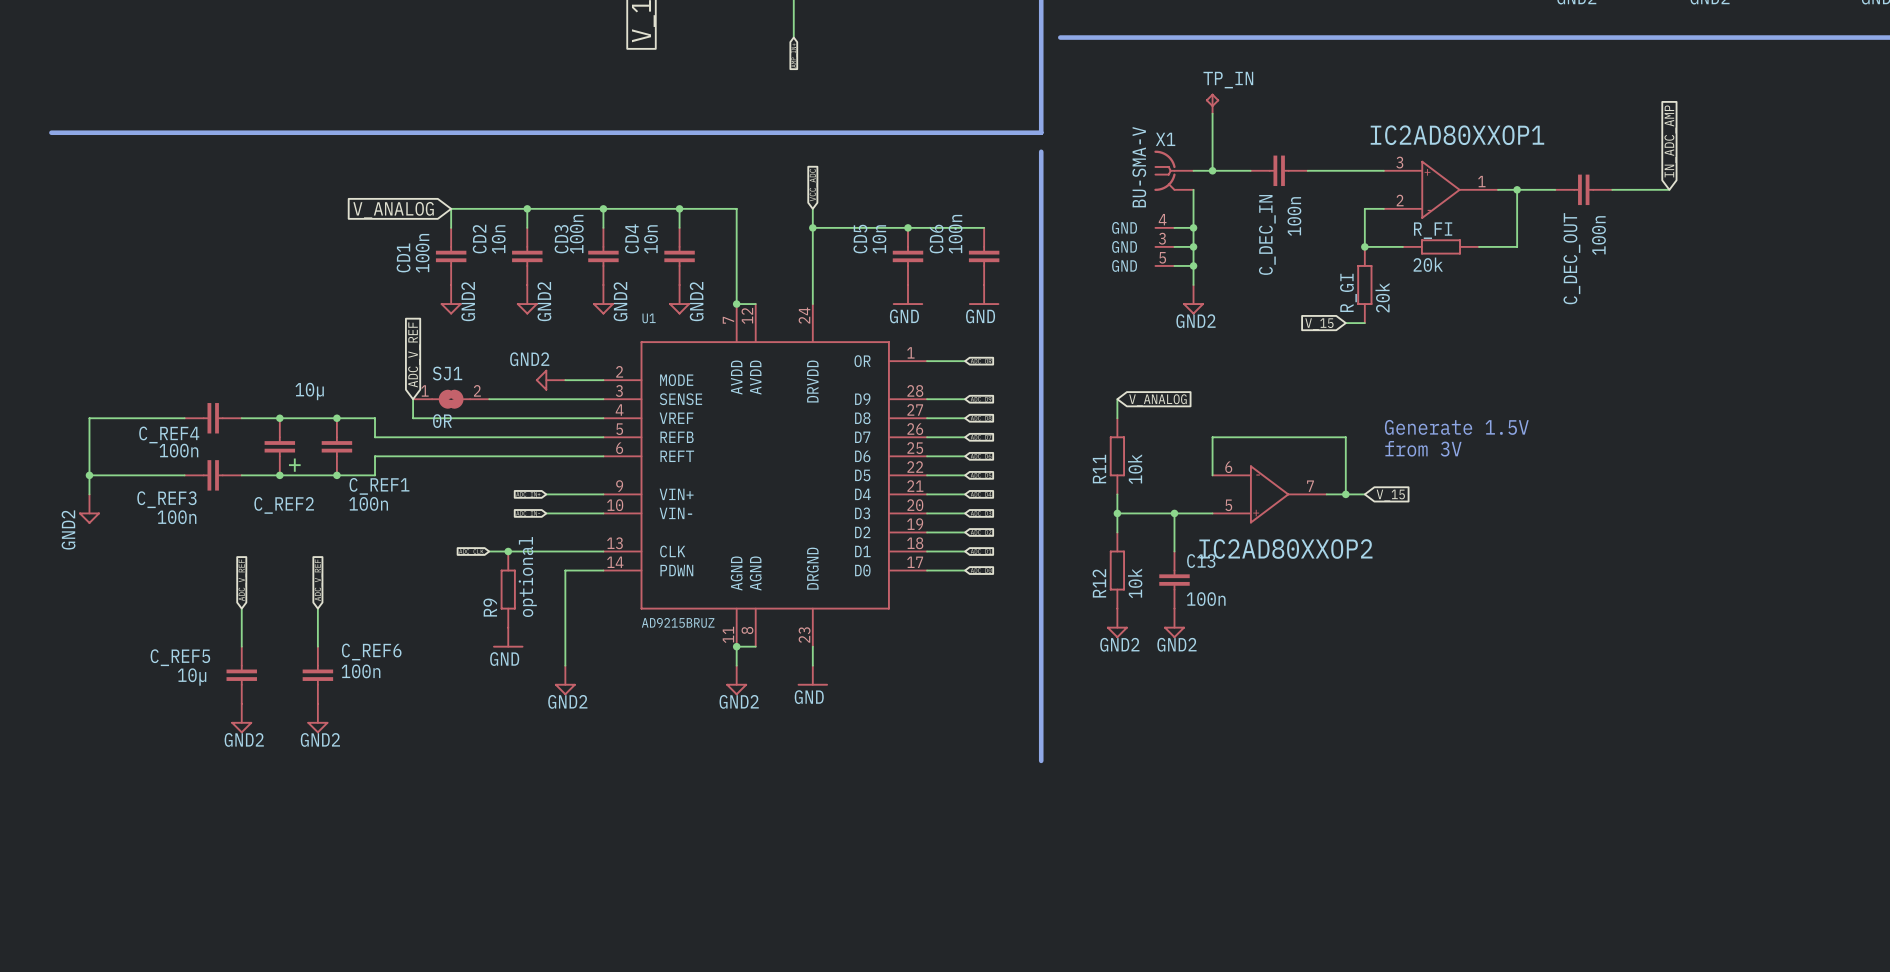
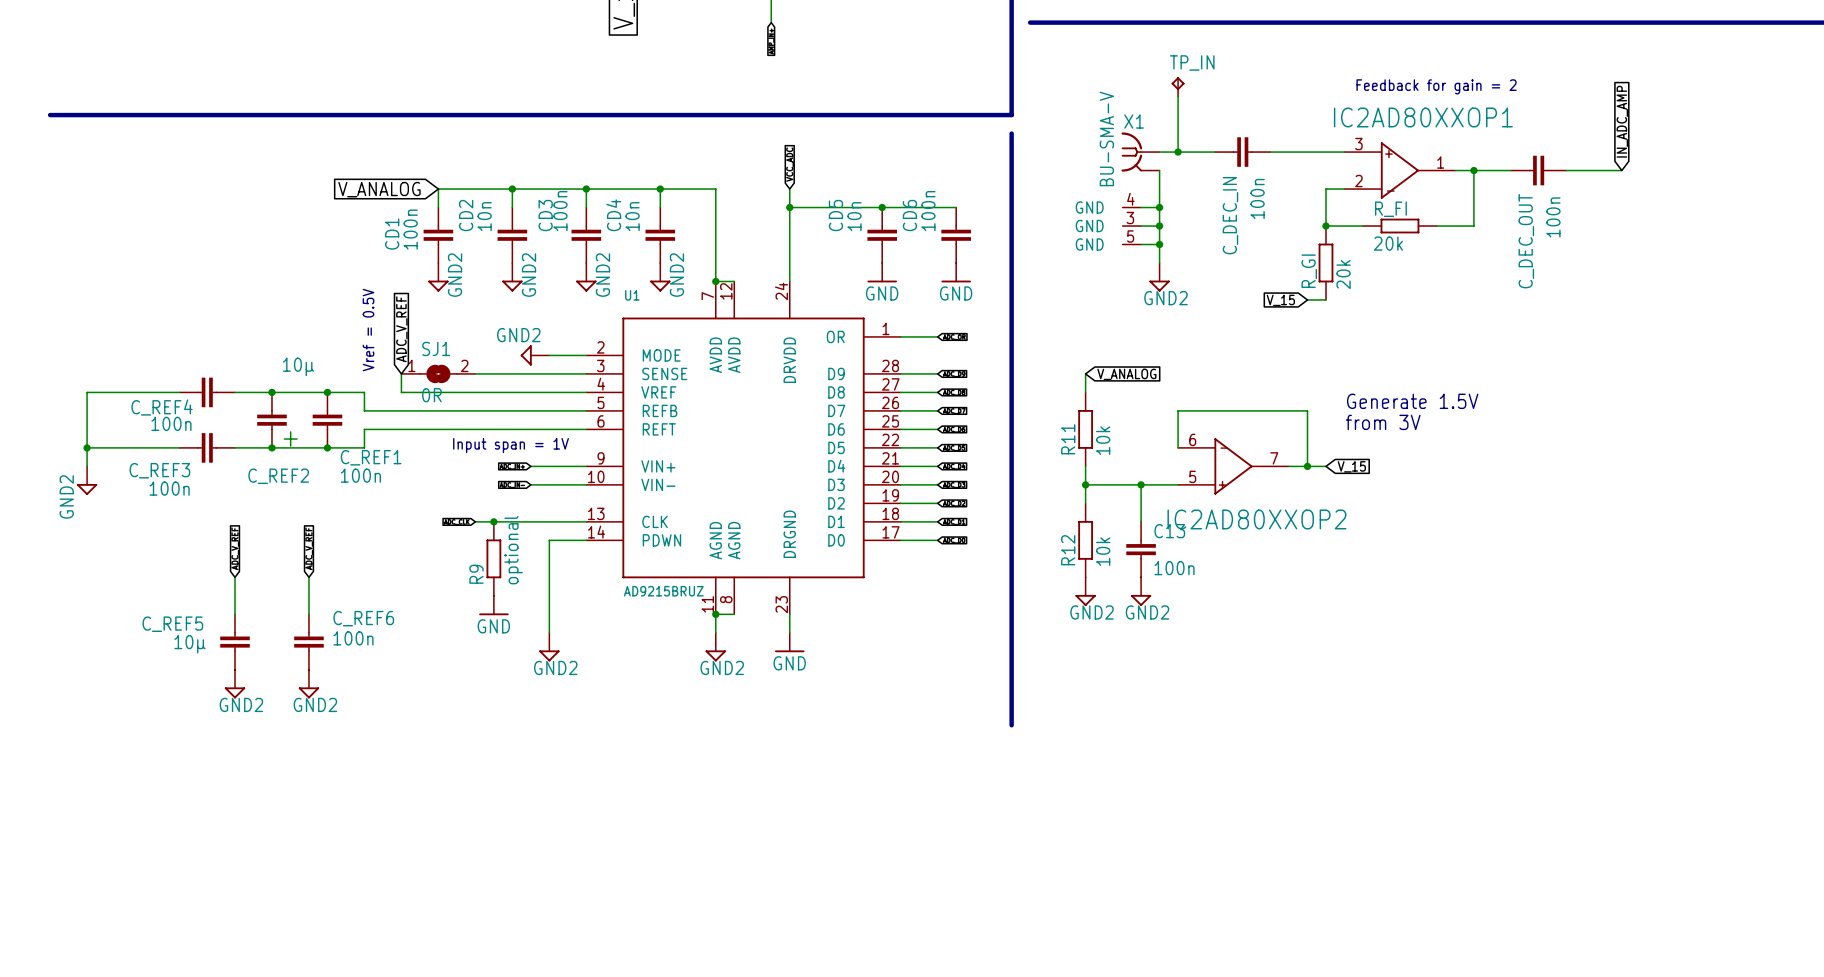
text: none -> Feedback for gain = 2 (1436, 86)
text: none -> Vref = 0.5V (368, 330)
text: none -> Input span = 1V (511, 445)

